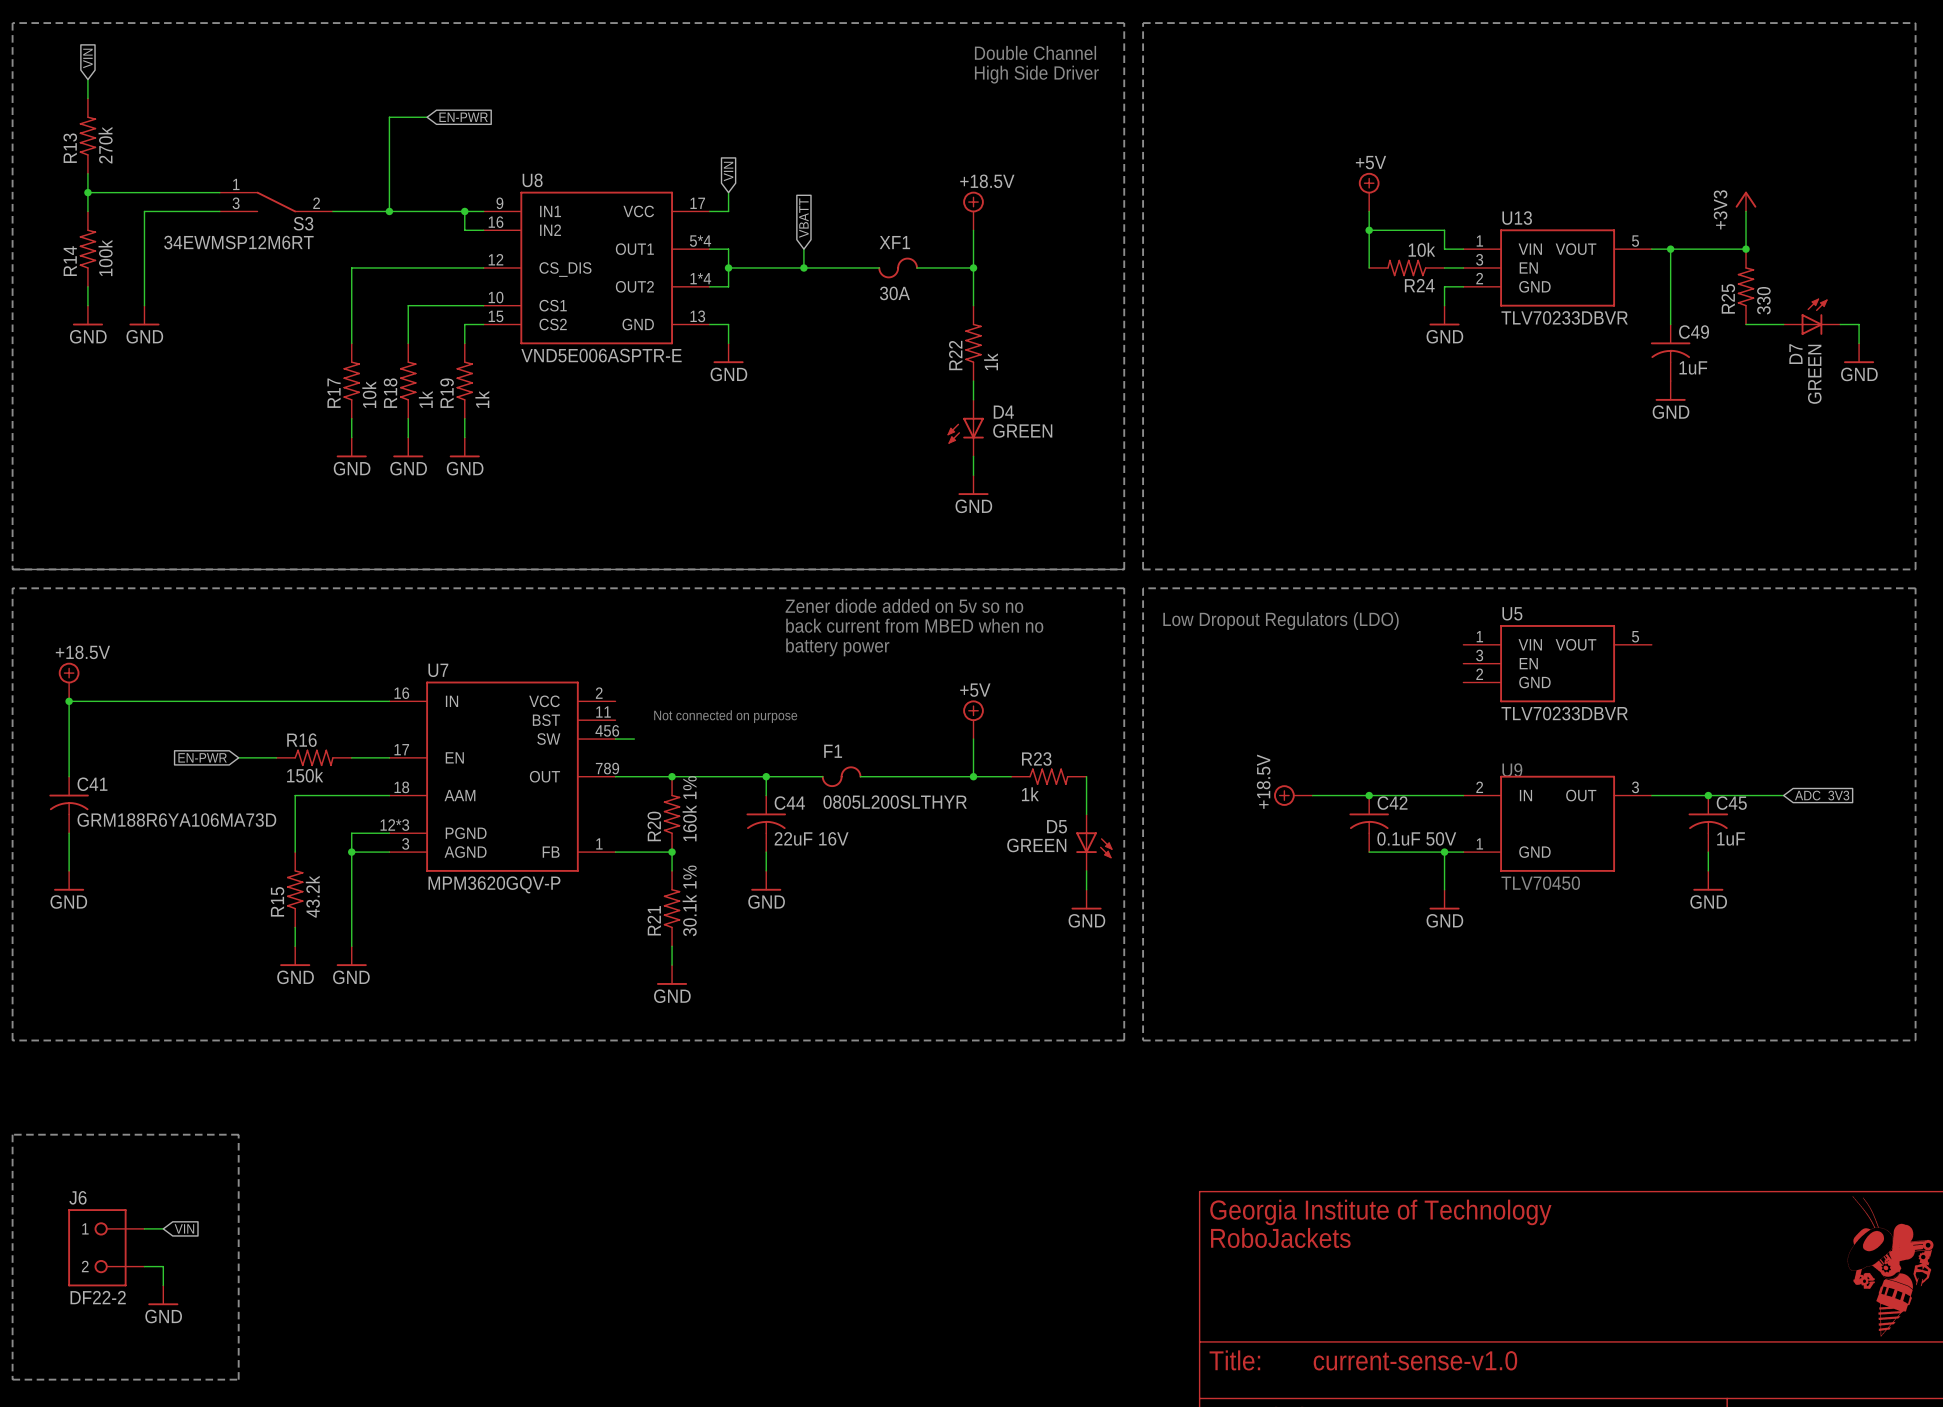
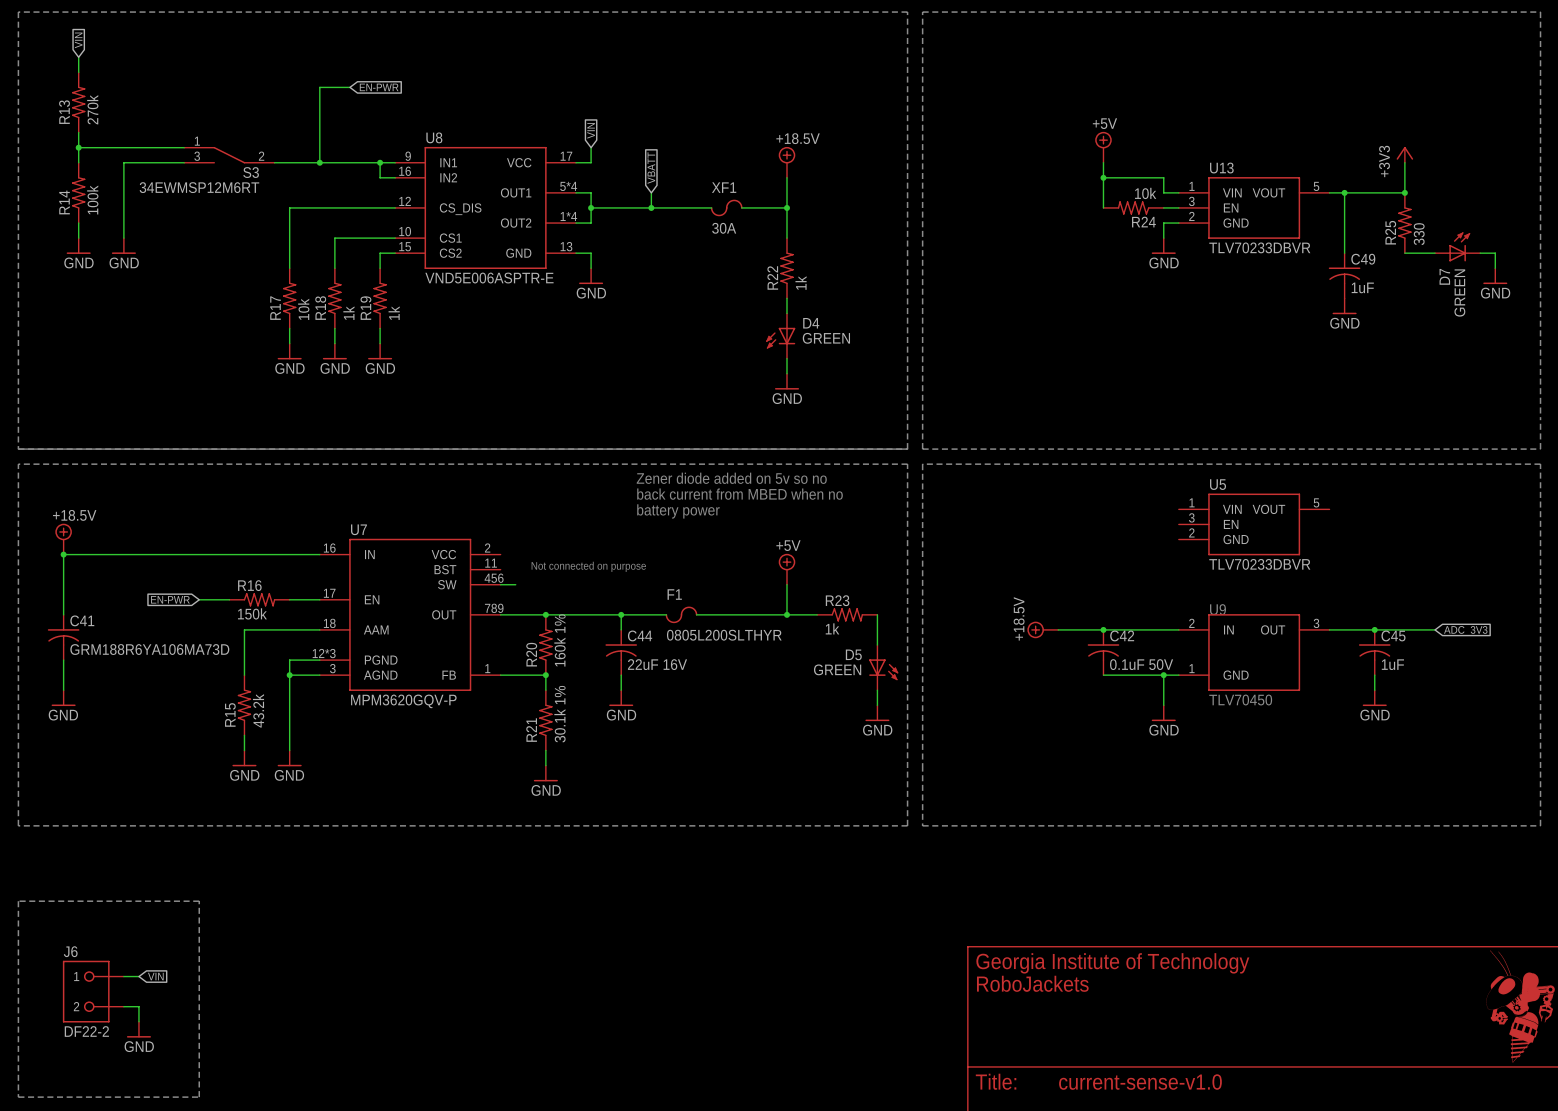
text: Double Channel (1035, 52) -> none
text: High Side Driver (1036, 74) -> none
text: Low Dropout Regulators (LDO) (1281, 621) -> none

